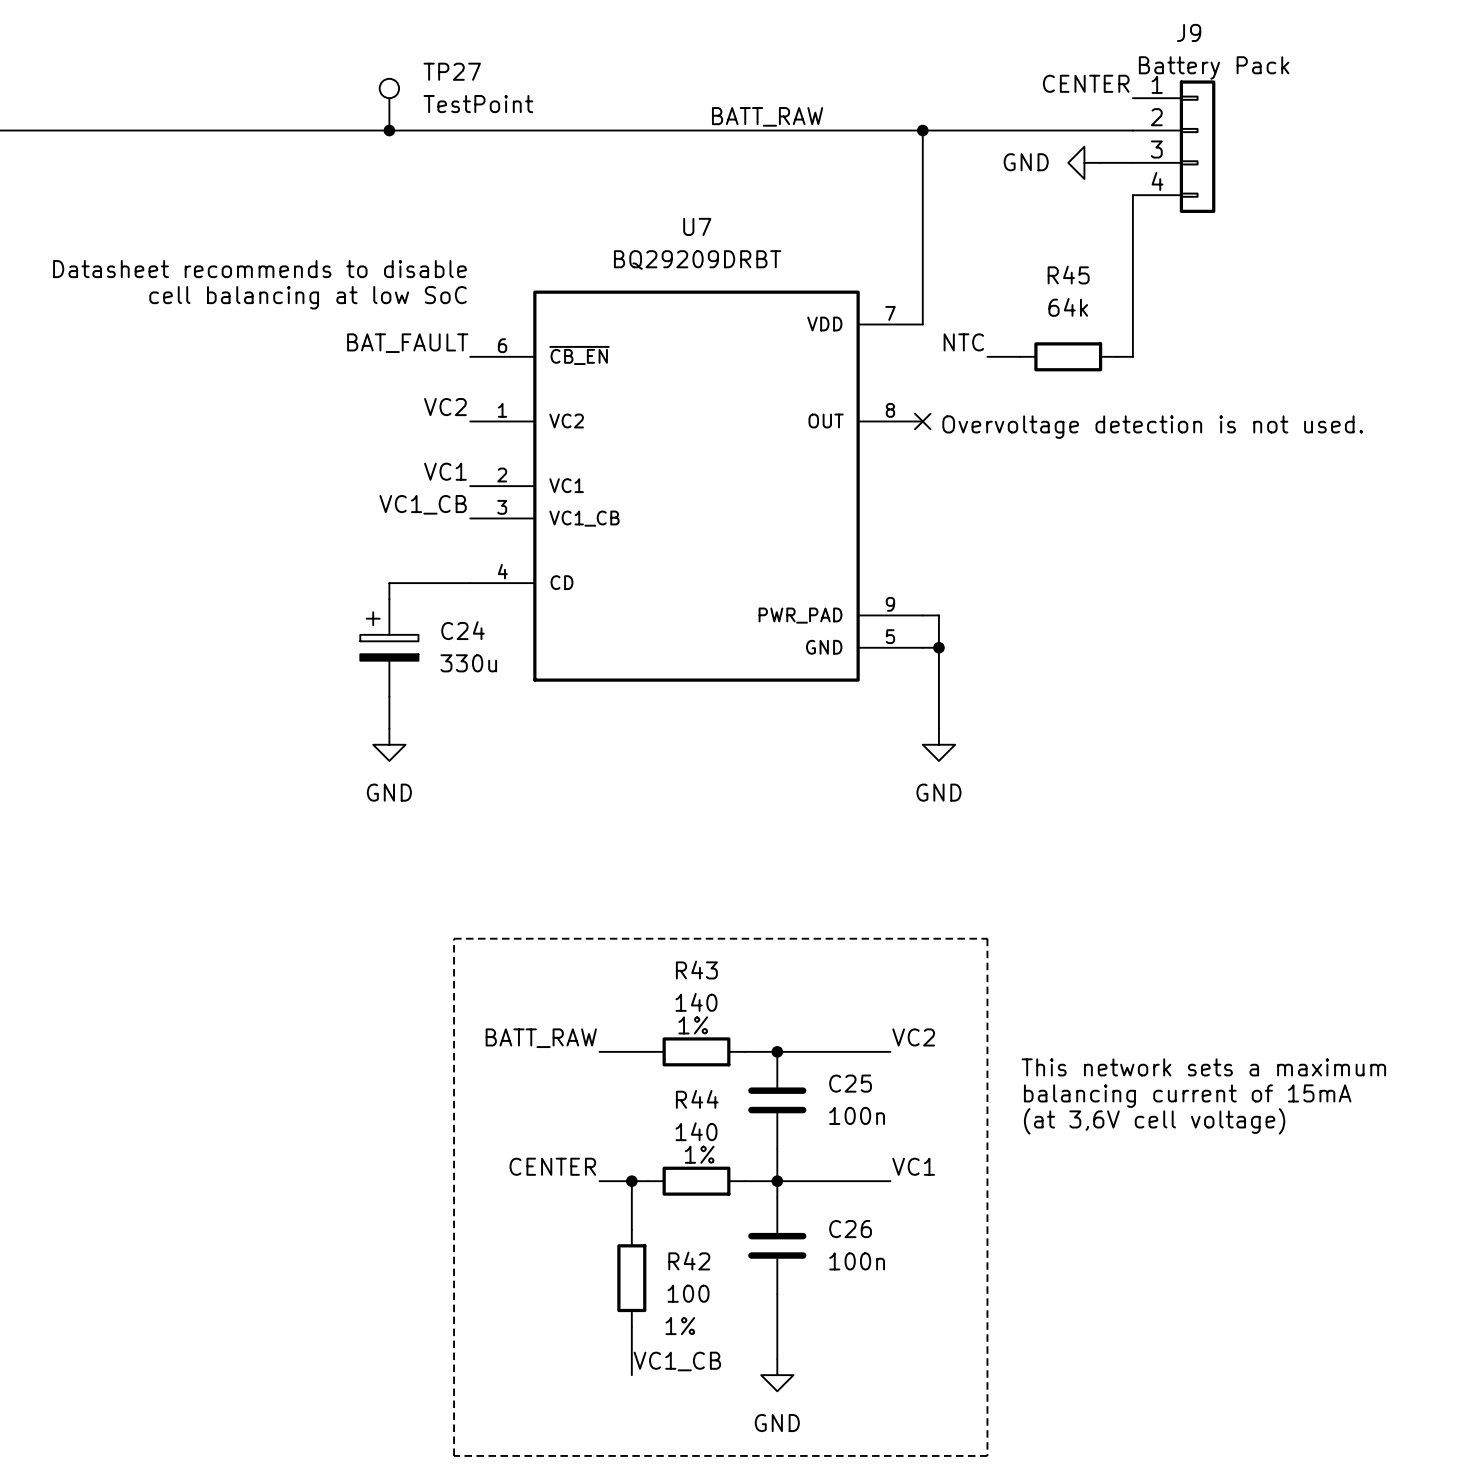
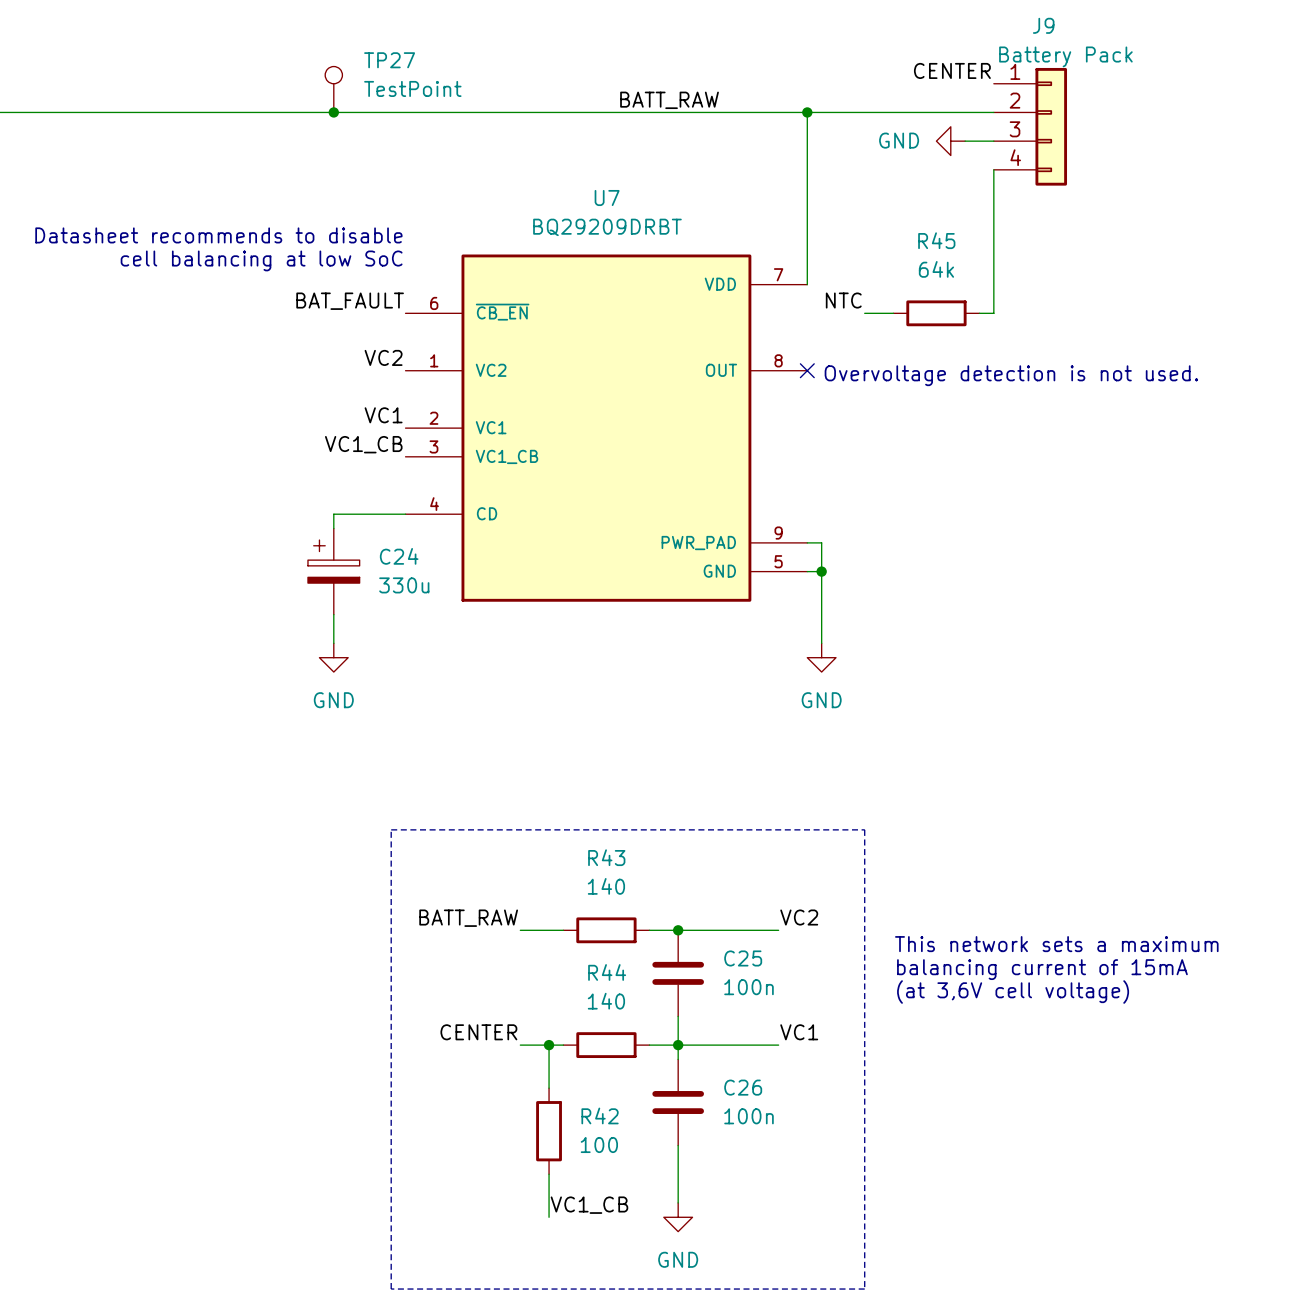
R43 text: 1% (693, 1025) -> none
R44 text: 1% (699, 1154) -> none
R42 text: 1% (680, 1326) -> none

